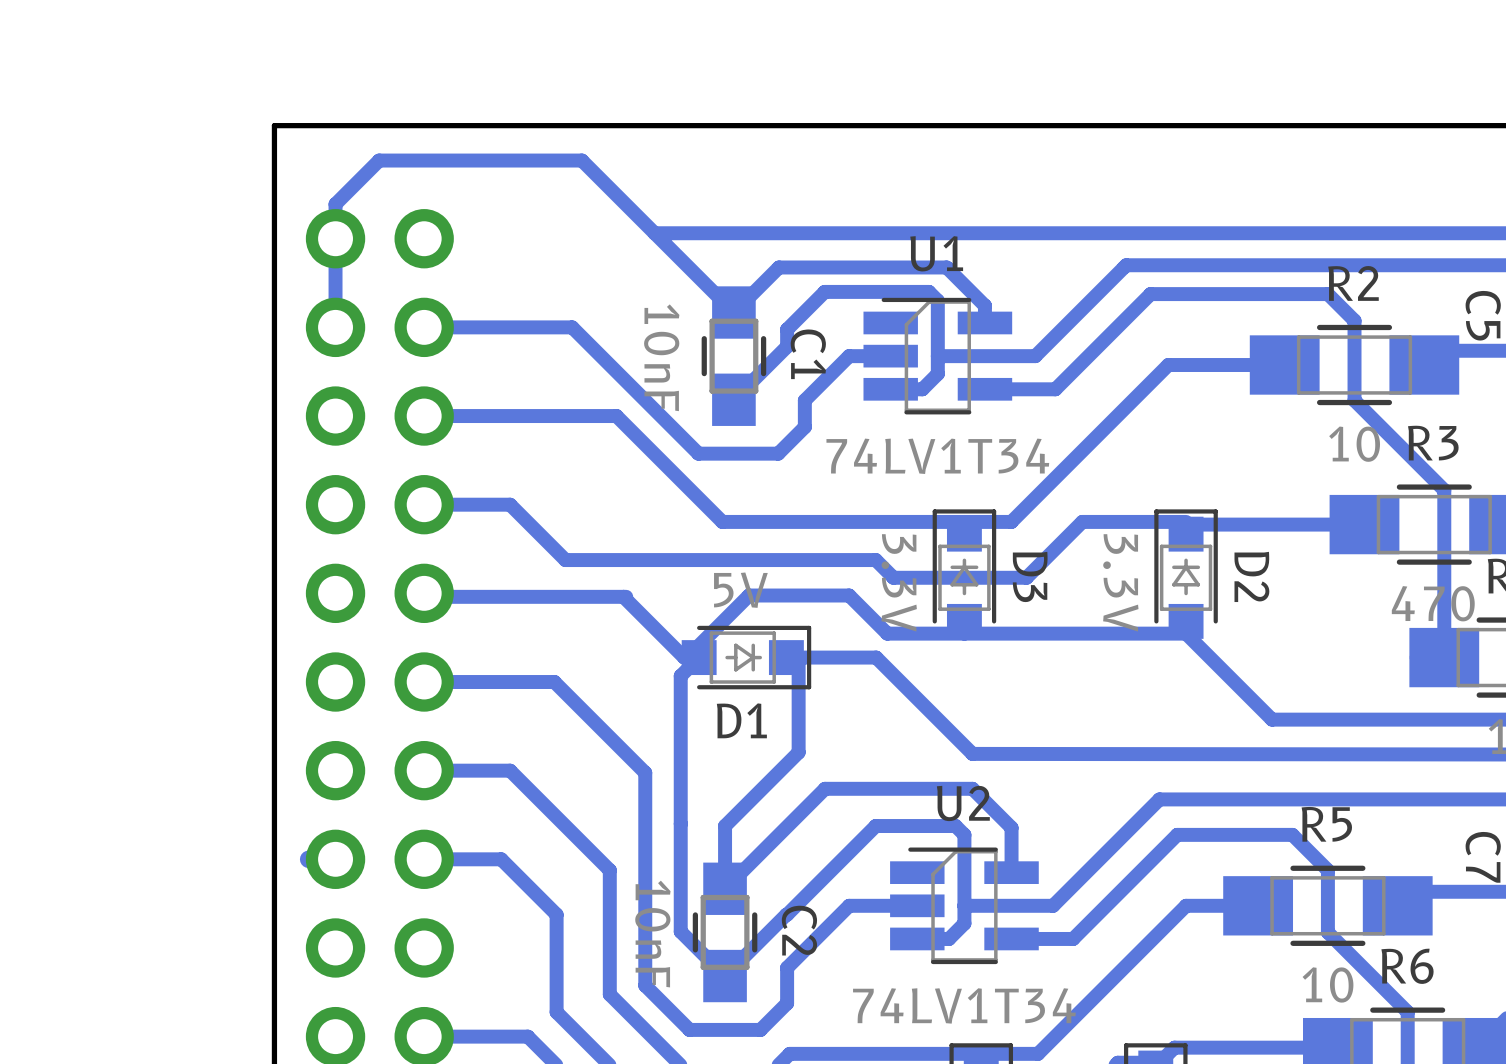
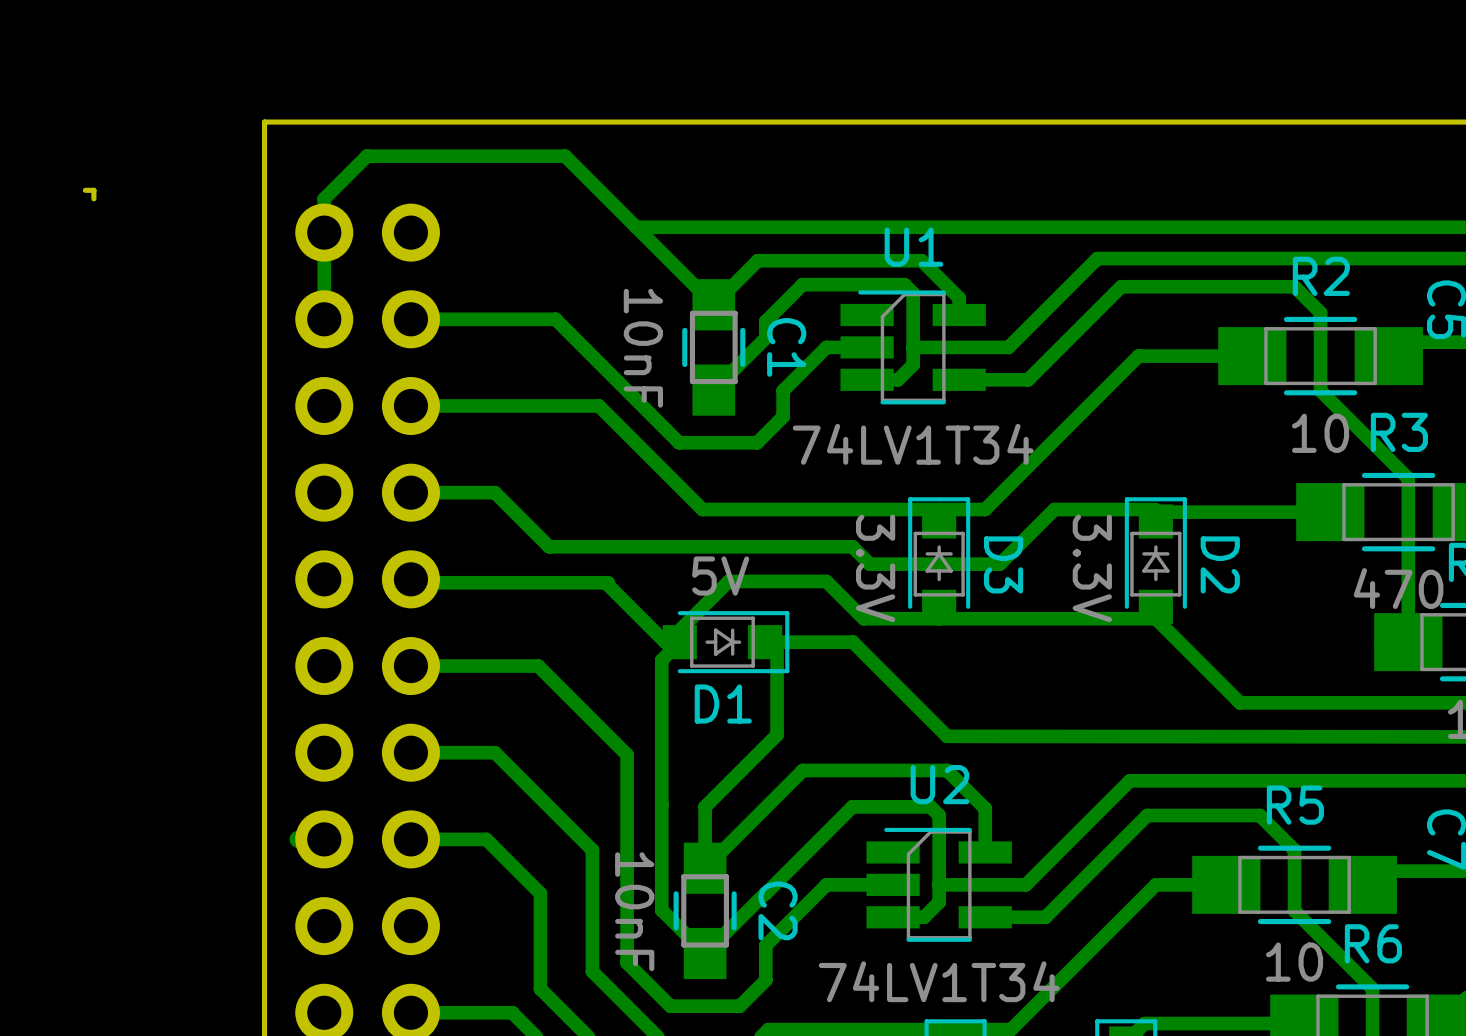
board edge: none -> (85, 190) (93, 190) (93, 198)

